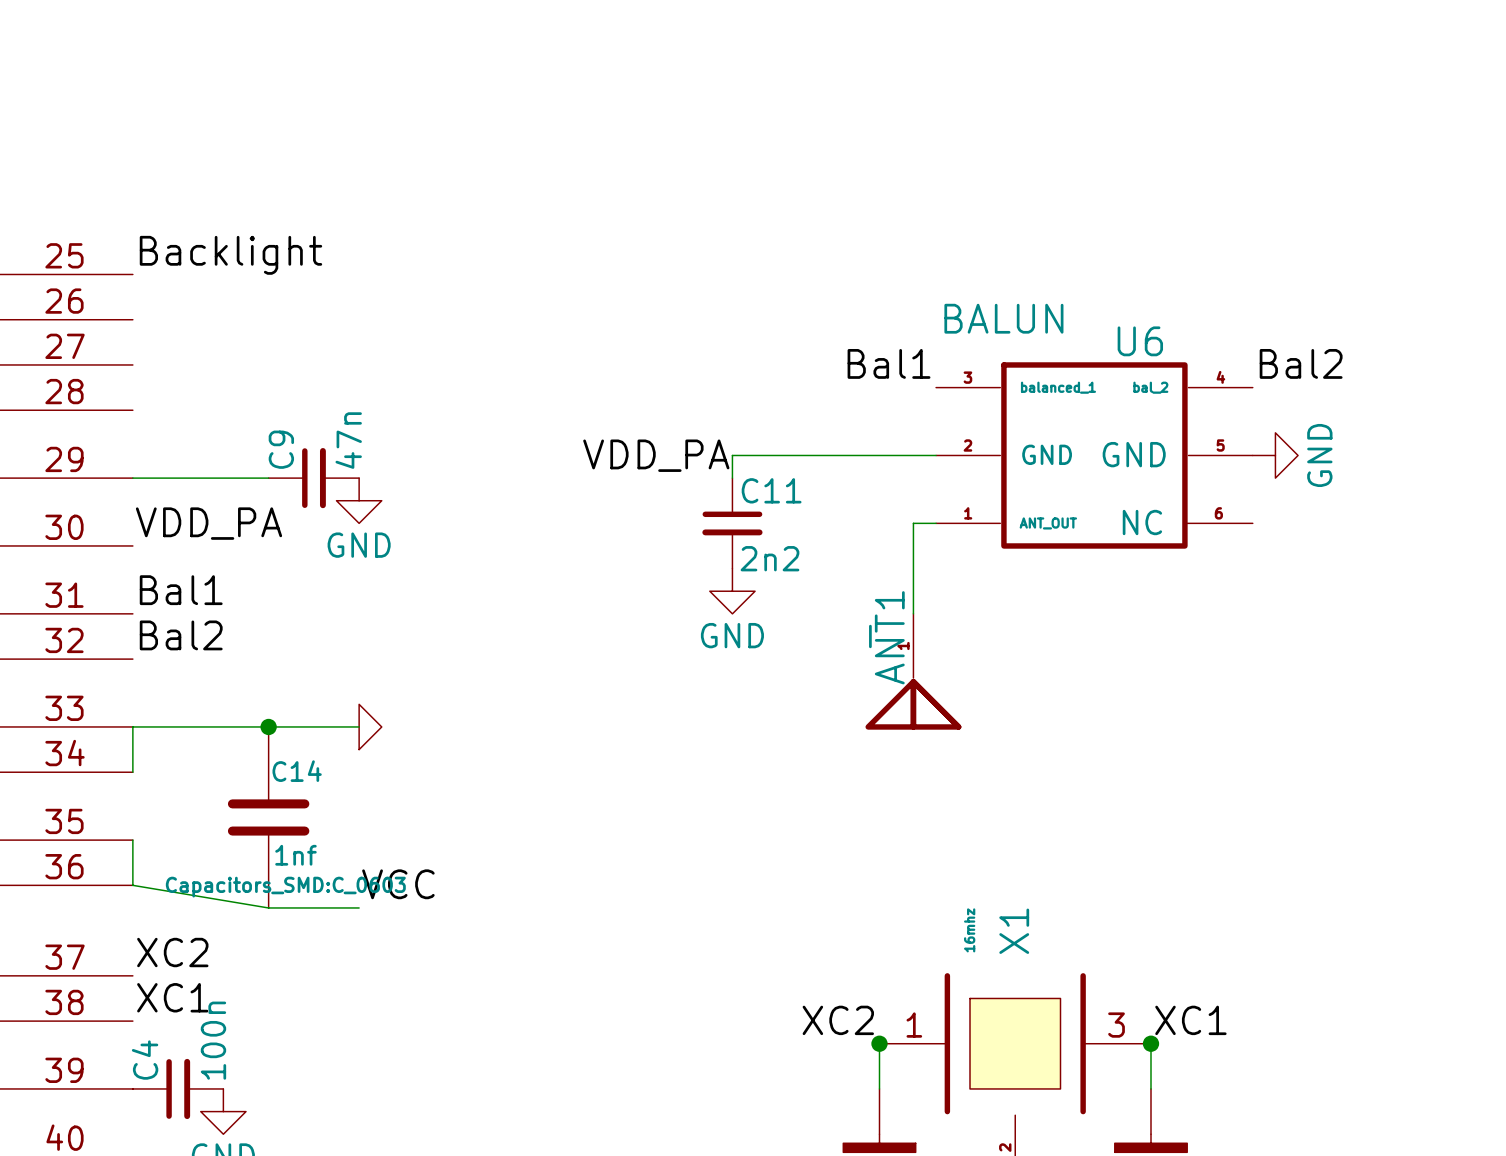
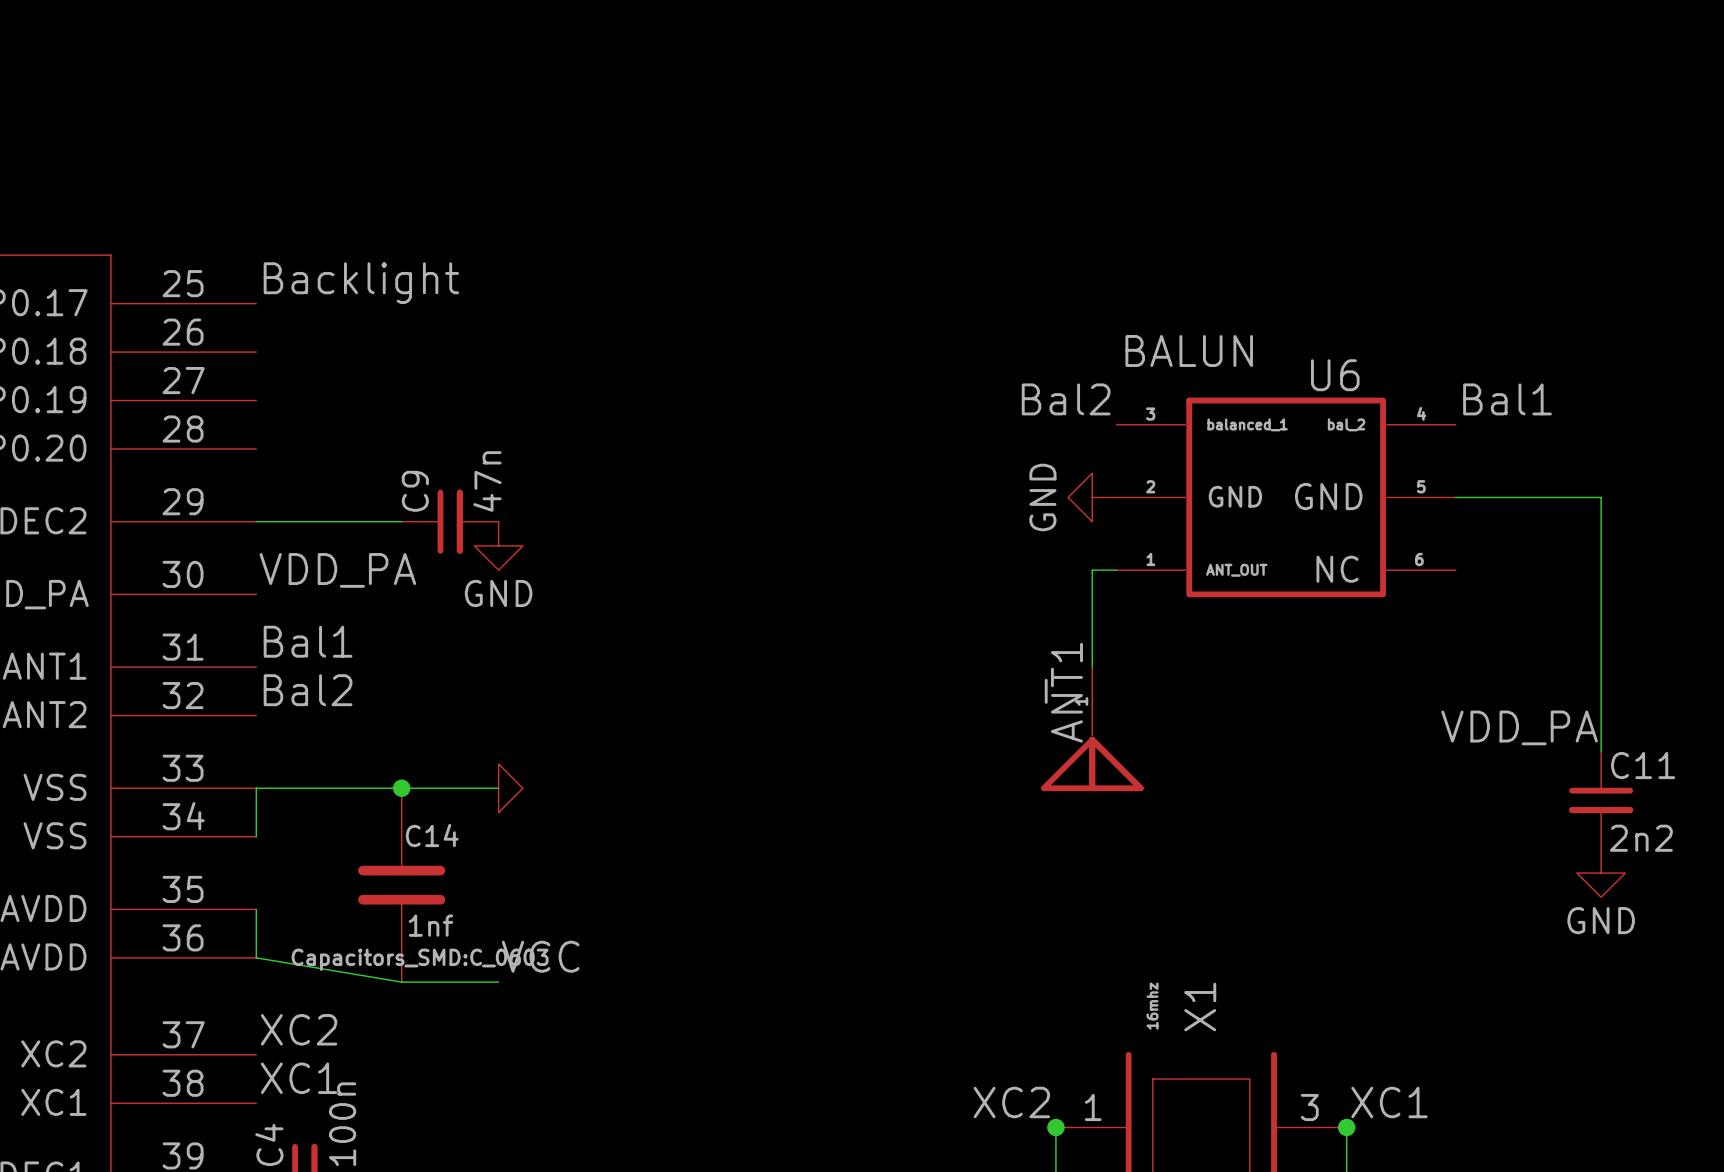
label: Bal1 (889, 363) -> Bal2 (1066, 399)
label: Bal2 (1301, 363) -> Bal1 (1507, 399)
label: VDD_PA (656, 455) -> none
power symbol: none -> GND (1092, 497)
wire: (936, 455) (732, 455) (732, 478) -> none
wire: none -> (1455, 497) (1601, 497) (1601, 751)
power symbol: GND (1275, 455) -> none
C11 position: (732, 523) -> (1601, 800)
power symbol: GND (732, 591) -> none
label: none -> VDD_PA (1519, 727)
power symbol: none -> GND (1601, 873)

